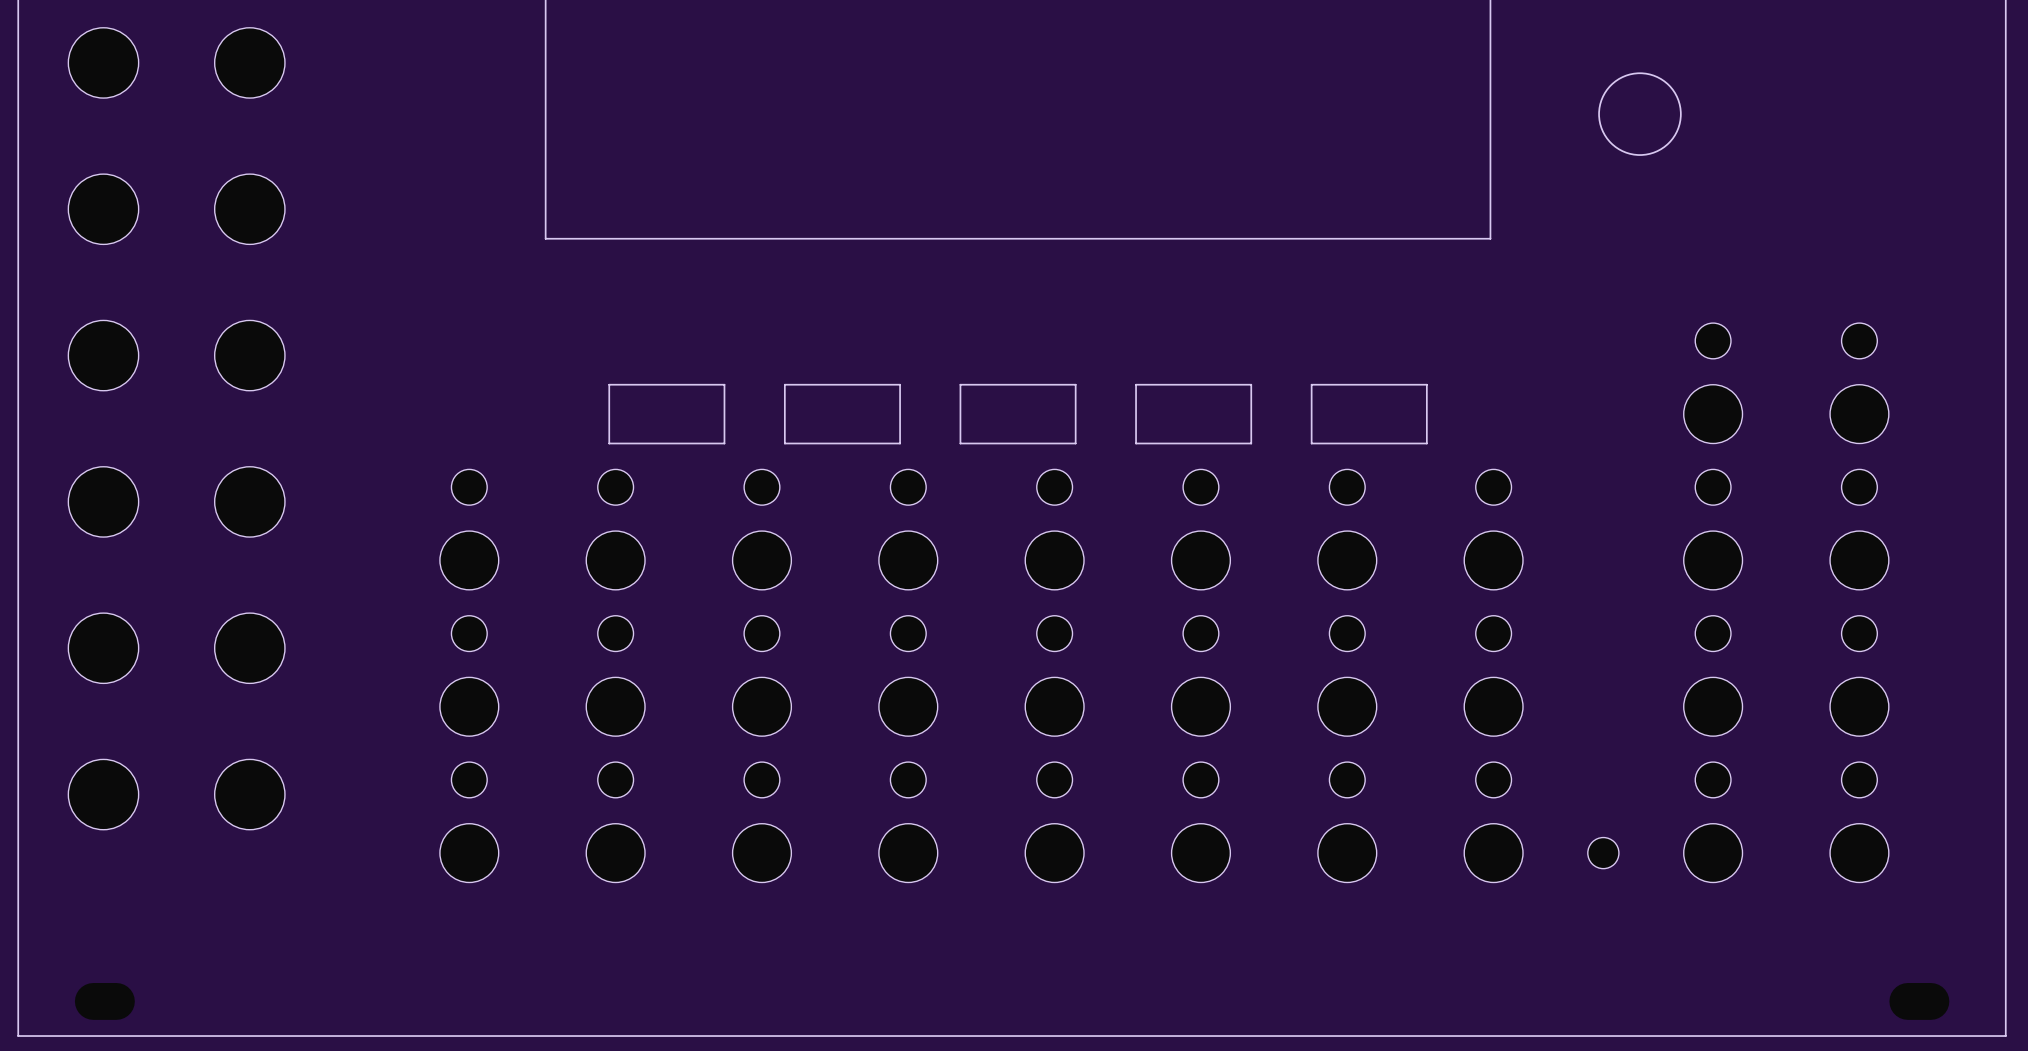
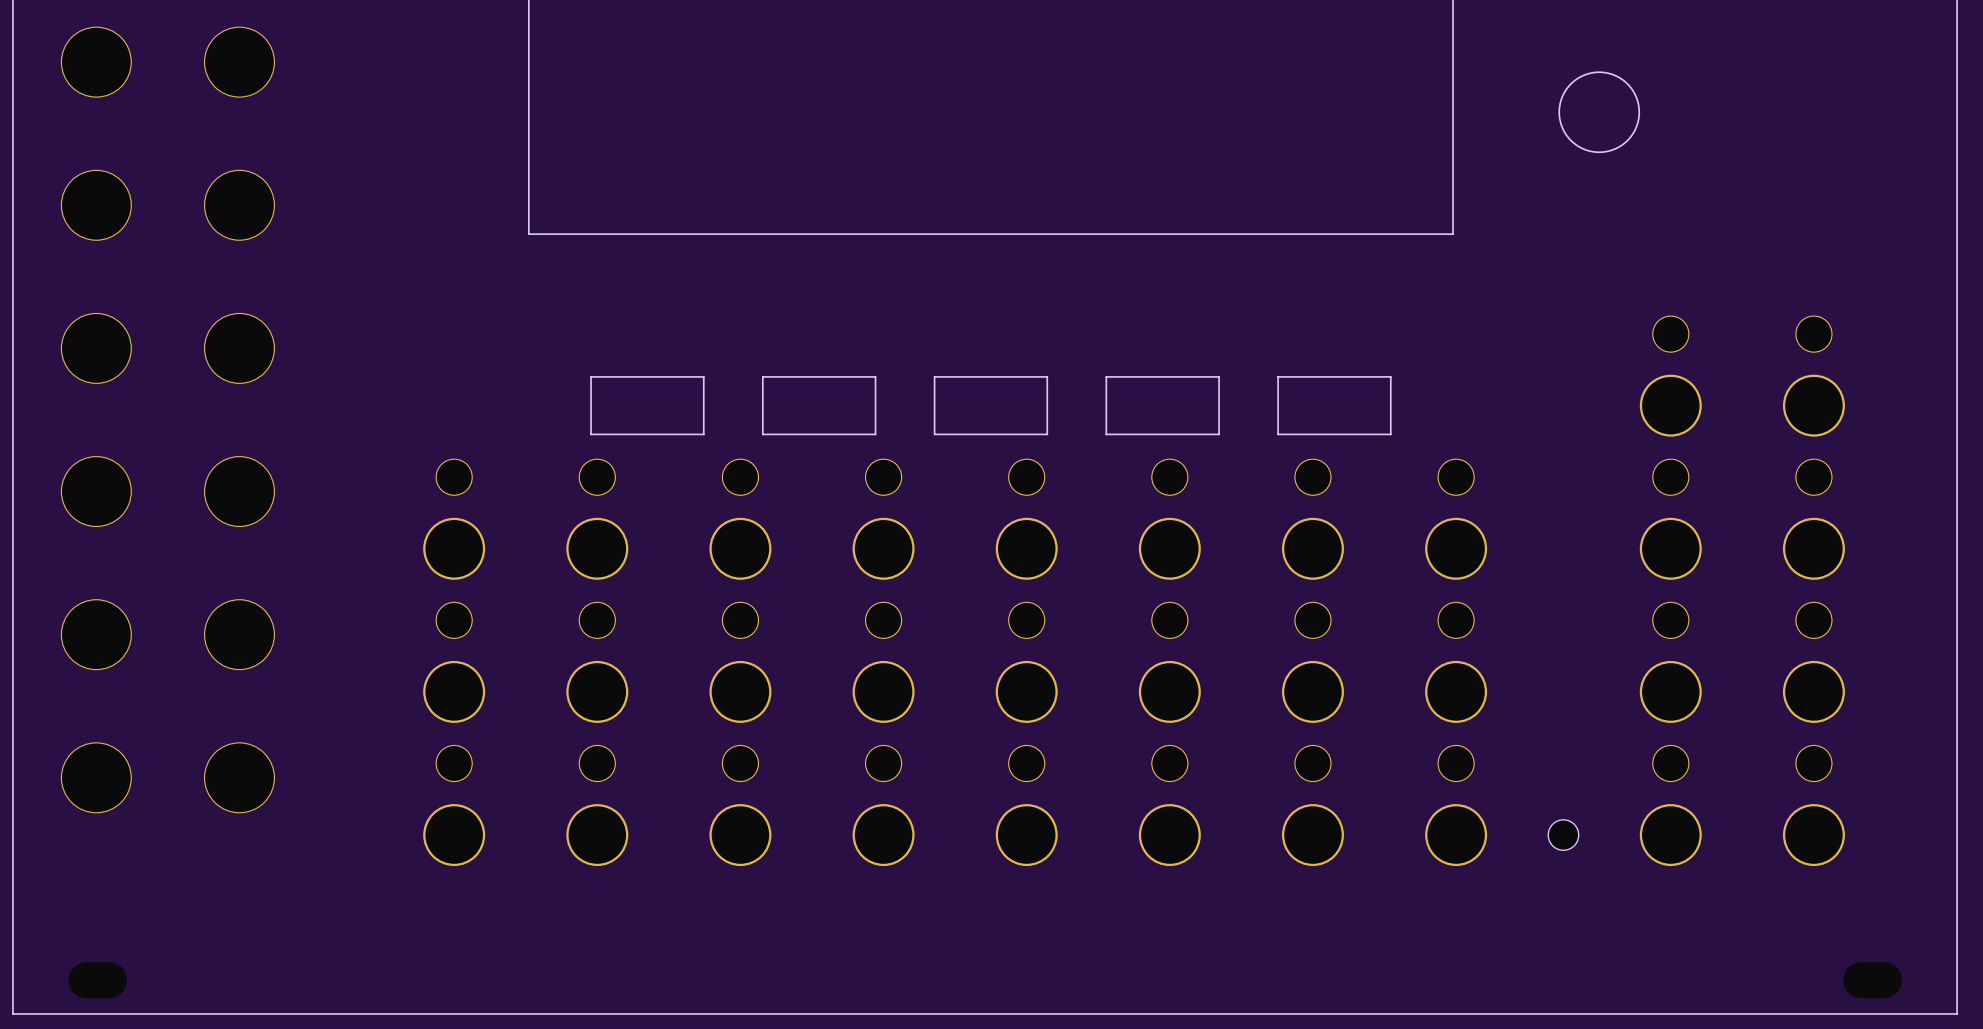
part footprint: [68, 27, 139, 99] -> [60, 26, 132, 98]
part footprint: [214, 27, 285, 99] -> [203, 26, 275, 98]
part footprint: [68, 174, 139, 245] -> [60, 169, 132, 241]
part footprint: [214, 174, 285, 245] -> [203, 169, 275, 241]
part footprint: [68, 320, 139, 391] -> [60, 312, 132, 384]
part footprint: [214, 320, 285, 391] -> [203, 312, 275, 384]
part footprint: [1695, 323, 1731, 359] -> [1652, 315, 1690, 353]
part footprint: [1841, 323, 1878, 359] -> [1795, 315, 1833, 353]
part footprint: [1683, 384, 1743, 444] -> [1639, 374, 1702, 437]
part footprint: [1830, 384, 1889, 444] -> [1782, 374, 1845, 437]
part footprint: [68, 466, 139, 538] -> [60, 456, 132, 528]
part footprint: [214, 466, 285, 538] -> [203, 456, 275, 528]
part footprint: [451, 469, 488, 506] -> [435, 458, 473, 496]
part footprint: [597, 469, 634, 506] -> [578, 458, 616, 496]
part footprint: [744, 469, 780, 506] -> [721, 458, 760, 496]
part footprint: [890, 469, 927, 506] -> [864, 458, 903, 496]
part footprint: [1036, 469, 1073, 506] -> [1008, 458, 1046, 496]
part footprint: [1183, 469, 1219, 506] -> [1151, 458, 1189, 496]
part footprint: [1329, 469, 1366, 506] -> [1294, 458, 1332, 496]
part footprint: [1475, 469, 1512, 506] -> [1437, 458, 1475, 496]
part footprint: [1695, 469, 1731, 506] -> [1652, 458, 1690, 496]
part footprint: [1841, 469, 1878, 506] -> [1795, 458, 1833, 496]
part footprint: [439, 531, 499, 590] -> [423, 517, 486, 580]
part footprint: [586, 531, 646, 590] -> [566, 517, 629, 580]
part footprint: [732, 531, 792, 590] -> [709, 517, 772, 580]
part footprint: [878, 531, 938, 590] -> [852, 517, 915, 580]
part footprint: [1025, 531, 1085, 590] -> [995, 517, 1058, 580]
part footprint: [1171, 531, 1231, 590] -> [1138, 517, 1201, 580]
part footprint: [1317, 531, 1377, 590] -> [1281, 517, 1344, 580]
part footprint: [1464, 531, 1524, 590] -> [1425, 517, 1488, 580]
part footprint: [1683, 531, 1743, 590] -> [1639, 517, 1702, 580]
part footprint: [1830, 531, 1889, 590] -> [1782, 517, 1845, 580]
part footprint: [68, 613, 139, 684] -> [60, 599, 132, 671]
part footprint: [214, 613, 285, 684] -> [203, 599, 275, 671]
part footprint: [451, 615, 488, 652] -> [435, 601, 473, 639]
part footprint: [597, 615, 634, 652] -> [578, 601, 616, 639]
part footprint: [744, 615, 780, 652] -> [721, 601, 760, 639]
part footprint: [890, 615, 927, 652] -> [864, 601, 903, 639]
part footprint: [1036, 615, 1073, 652] -> [1008, 601, 1046, 639]
part footprint: [1183, 615, 1219, 652] -> [1151, 601, 1189, 639]
part footprint: [1329, 615, 1366, 652] -> [1294, 601, 1332, 639]
part footprint: [1475, 615, 1512, 652] -> [1437, 601, 1475, 639]
part footprint: [1695, 615, 1731, 652] -> [1652, 601, 1690, 639]
part footprint: [1841, 615, 1878, 652] -> [1795, 601, 1833, 639]
part footprint: [439, 677, 499, 737] -> [423, 660, 486, 723]
part footprint: [586, 677, 646, 737] -> [566, 660, 629, 723]
part footprint: [732, 677, 792, 737] -> [709, 660, 772, 723]
part footprint: [878, 677, 938, 737] -> [852, 660, 915, 723]
part footprint: [1025, 677, 1085, 737] -> [995, 660, 1058, 723]
part footprint: [1171, 677, 1231, 737] -> [1138, 660, 1201, 723]
part footprint: [1317, 677, 1377, 737] -> [1281, 660, 1344, 723]
part footprint: [1464, 677, 1524, 737] -> [1425, 660, 1488, 723]
part footprint: [1683, 677, 1743, 737] -> [1639, 660, 1702, 723]
part footprint: [1830, 677, 1889, 737] -> [1782, 660, 1845, 723]
part footprint: [68, 759, 139, 830] -> [60, 742, 132, 814]
part footprint: [214, 759, 285, 830] -> [203, 742, 275, 814]
part footprint: [451, 762, 488, 798] -> [435, 744, 473, 783]
part footprint: [597, 762, 634, 798] -> [578, 744, 616, 783]
part footprint: [744, 762, 780, 798] -> [721, 744, 760, 783]
part footprint: [890, 762, 927, 798] -> [864, 744, 903, 783]
part footprint: [1036, 762, 1073, 798] -> [1008, 744, 1046, 783]
part footprint: [1183, 762, 1219, 798] -> [1151, 744, 1189, 783]
part footprint: [1329, 762, 1366, 798] -> [1294, 744, 1332, 783]
part footprint: [1475, 762, 1512, 798] -> [1437, 744, 1475, 783]
part footprint: [1695, 762, 1731, 798] -> [1652, 744, 1690, 783]
part footprint: [1841, 762, 1878, 798] -> [1795, 744, 1833, 783]
part footprint: [439, 823, 499, 883] -> [423, 804, 486, 867]
part footprint: [586, 823, 646, 883] -> [566, 804, 629, 867]
part footprint: [732, 823, 792, 883] -> [709, 804, 772, 867]
part footprint: [878, 823, 938, 883] -> [852, 804, 915, 867]
part footprint: [1025, 823, 1085, 883] -> [995, 804, 1058, 867]
part footprint: [1171, 823, 1231, 883] -> [1138, 804, 1201, 867]
part footprint: [1317, 823, 1377, 883] -> [1281, 804, 1344, 867]
part footprint: [1464, 823, 1524, 883] -> [1425, 804, 1488, 867]
part footprint: [1683, 823, 1743, 883] -> [1639, 804, 1702, 867]
part footprint: [1830, 823, 1889, 883] -> [1782, 804, 1845, 867]

